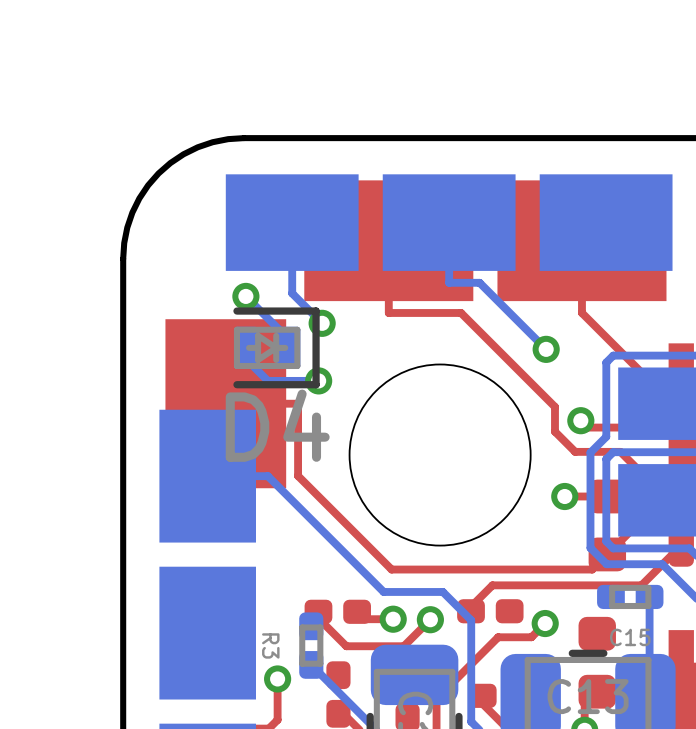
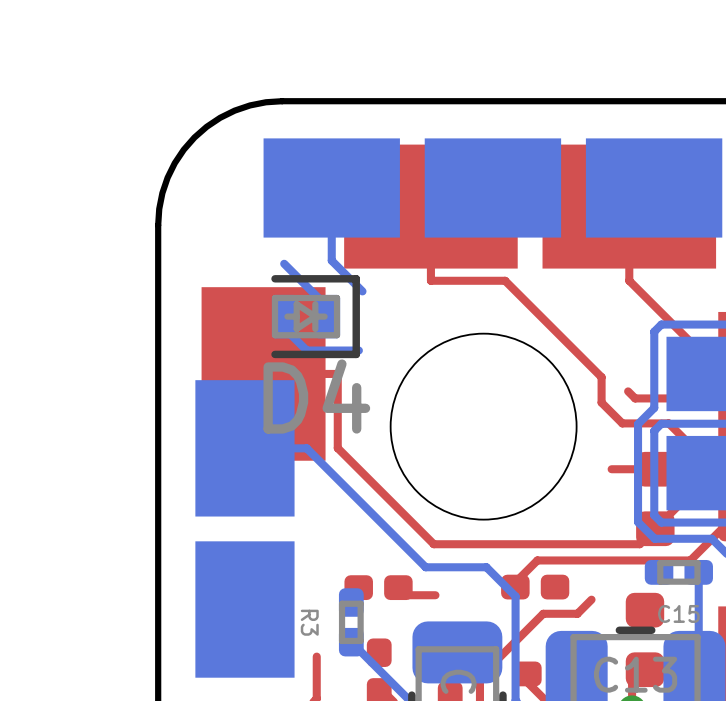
bottom track: (449, 222) (449, 282) (479, 282) (546, 349) -> none
via: (245, 296) -> none
via: (322, 323) -> none
via: (546, 349) -> none
via: (318, 380) -> none
via: (580, 420) -> none
via: (564, 496) -> none
top track: (318, 611) (318, 618) (346, 646) (403, 646) (430, 619) -> none
via: (393, 619) -> none
via: (430, 619) -> none
via: (545, 623) -> none
via: (277, 678) -> none

